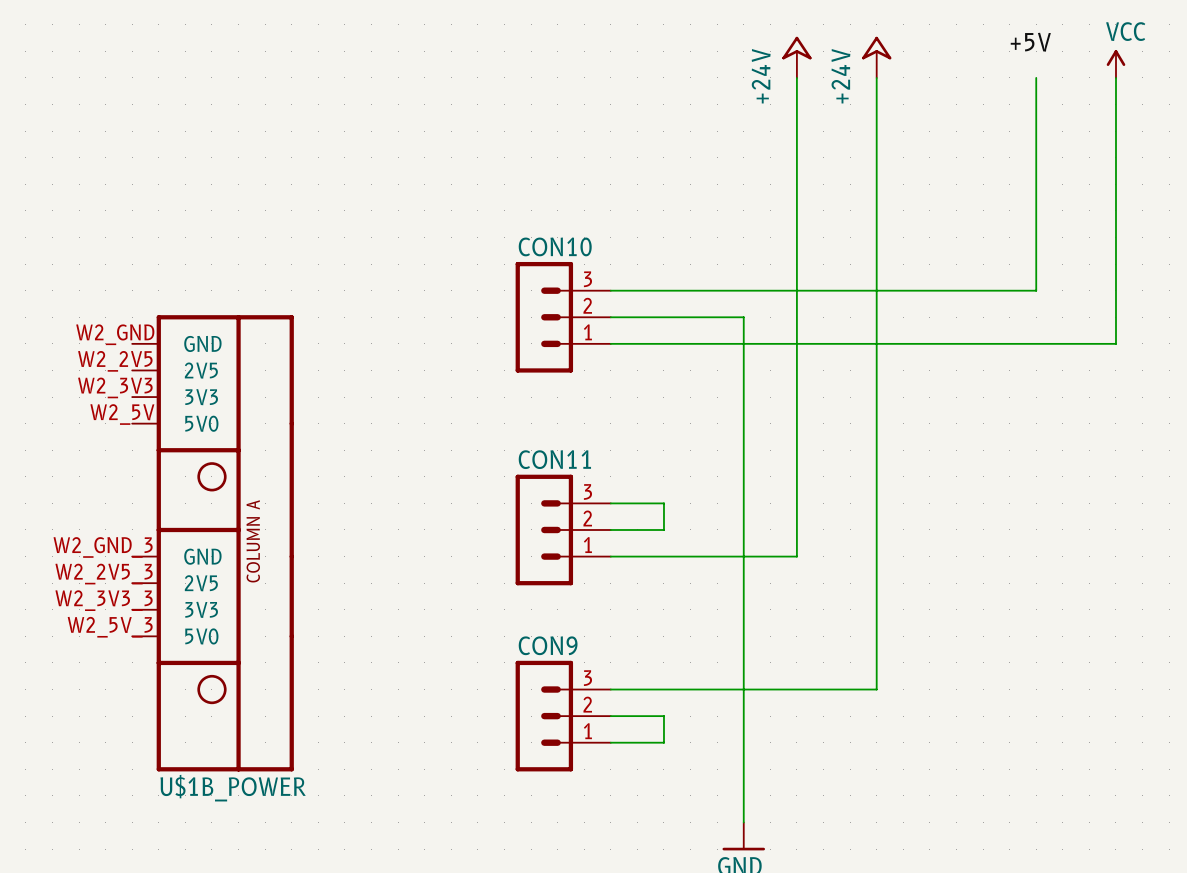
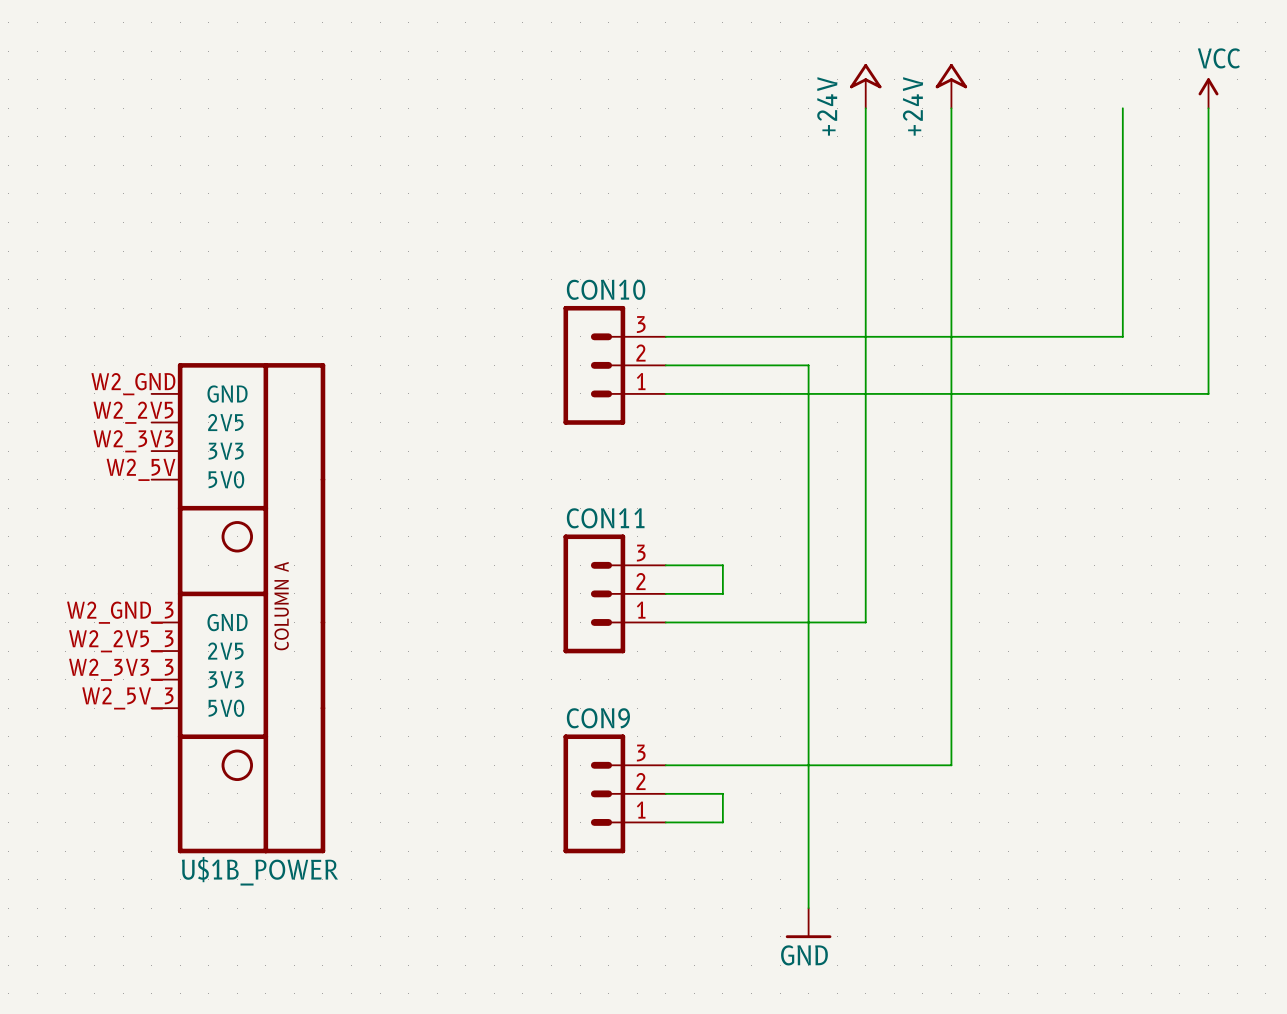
label: +5V (1030, 42) -> none

